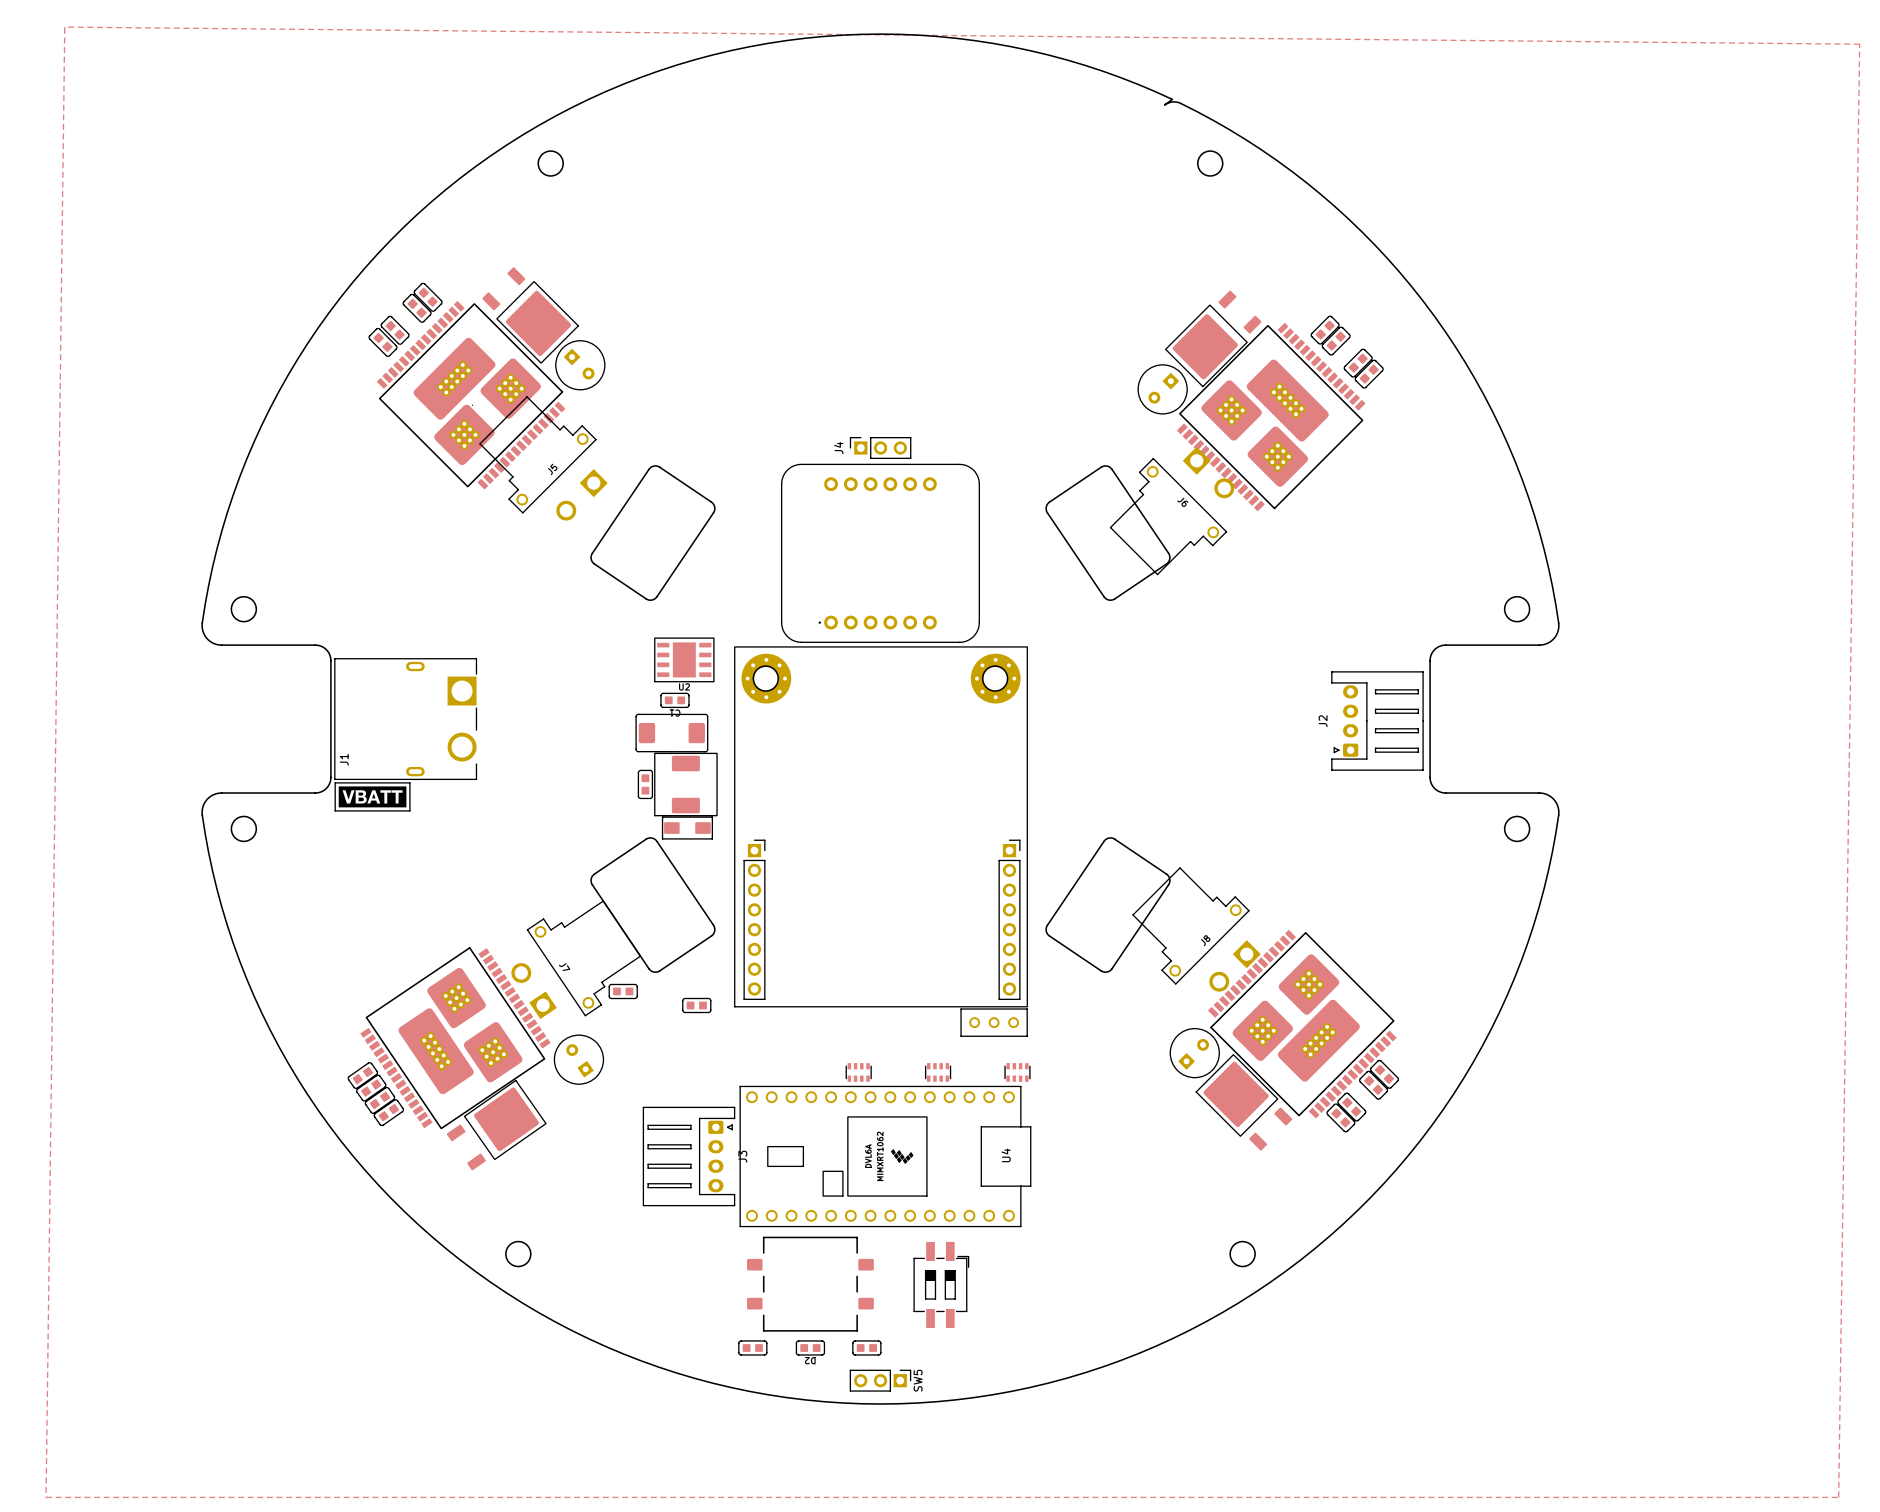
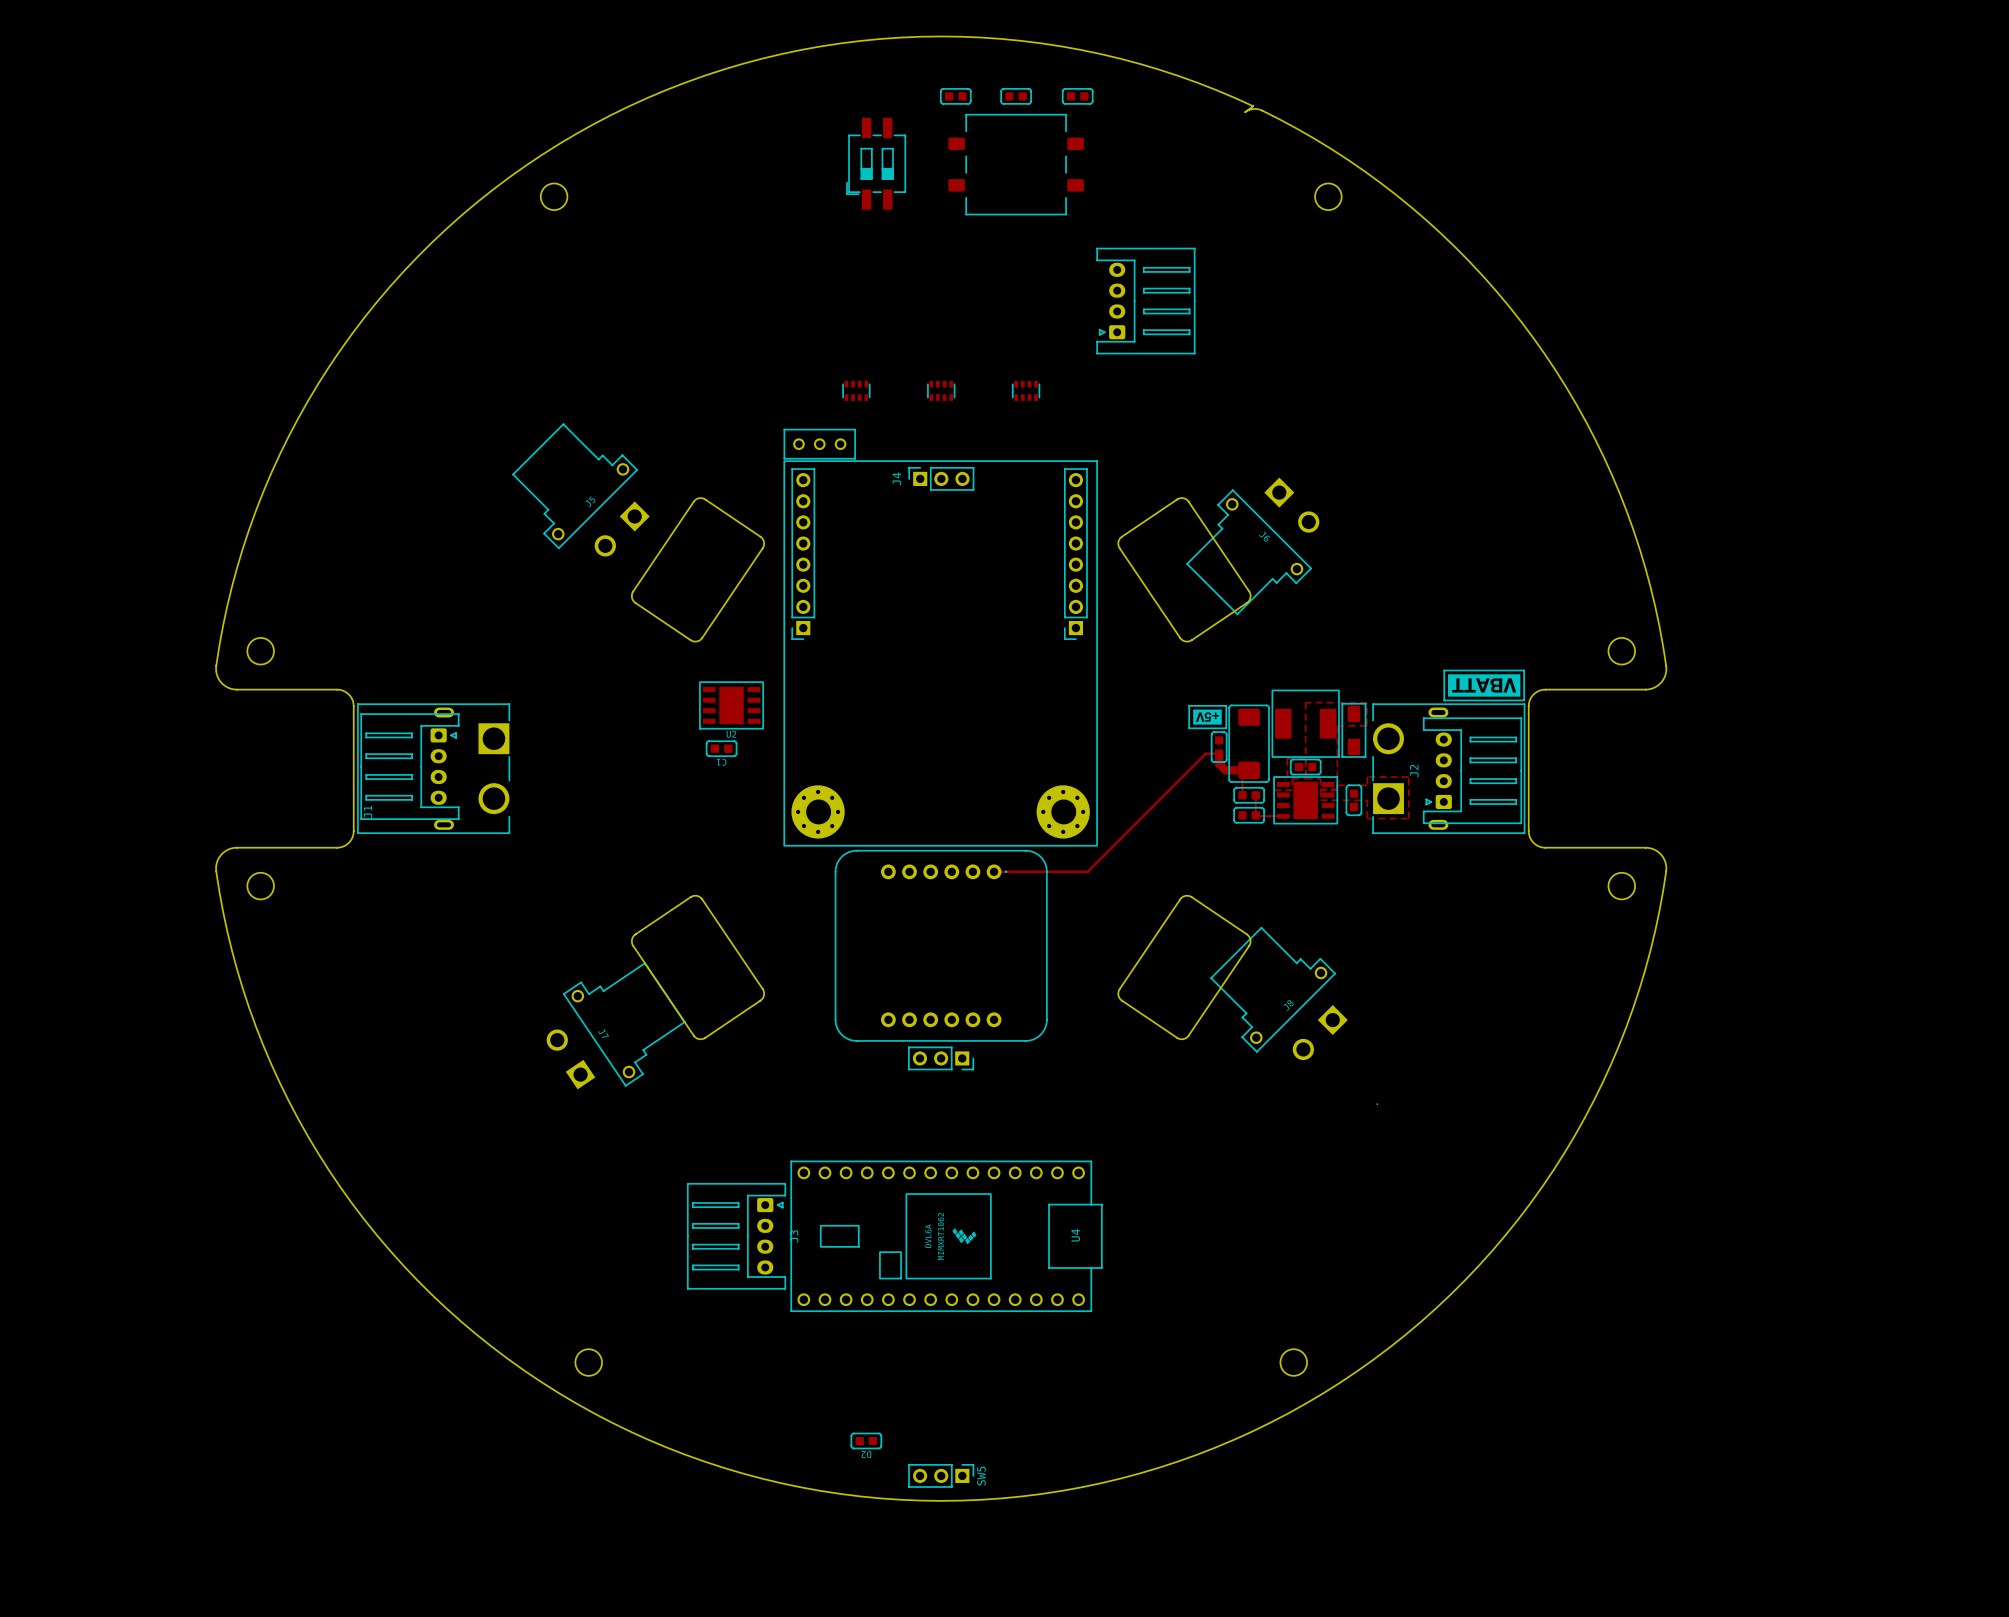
zone outline: (64, 27) (1859, 44) (1838, 1497) (46, 1497) (64, 27) -> none
part: none -> (955, 96)
part: none -> (1016, 96)
part: none -> (1077, 96)
part: none -> (876, 163)
part: none -> (1016, 164)
round board edge position: (550, 163) -> (554, 196)
round board edge position: (1210, 163) -> (1328, 196)
part: none -> (1145, 301)
part: (428, 297) -> none
part: (417, 308) -> none
part: (530, 315) -> none
part: (395, 330) -> none
part: (1325, 330) -> none
part: (1213, 338) -> none
part: (1336, 341) -> none
part: (383, 342) -> none
part: (1358, 363) -> none
part: (580, 365) -> none
part: none -> (856, 390)
part: none -> (941, 390)
part: none -> (1026, 390)
part: (1369, 374) -> none
part: (1162, 389) -> none
part: (471, 395) -> none
part: none -> (819, 444)
part: (1271, 417) -> none
part: (880, 553) -> none
part: none -> (940, 653)
line: none -> (1444, 670) (1444, 700) (1524, 700) (1524, 670) (1444, 670)
drawing: none -> [1448, 674, 1521, 697]
line: none -> (1189, 705) (1189, 728) (1226, 728) (1226, 705) (1189, 705)
drawing: none -> [1193, 709, 1222, 725]
part: none -> (1305, 723)
round board edge position: (765, 678) -> (818, 811)
round board edge position: (995, 678) -> (1063, 811)
part: none -> (1353, 730)
part: none -> (1249, 743)
part: none -> (1219, 747)
zone outline: none -> (1305, 758) (1287, 758) (1287, 776) (1274, 776) (1274, 790) (1292, 790) (1292, 778) (1305, 778)
part: none -> (409, 766)
part: none -> (1305, 767)
part: none -> (1448, 768)
zone outline: none -> (1367, 776) (1367, 785) (1337, 785) (1337, 790) (1320, 790) (1320, 800) (1367, 800) (1367, 818) (1408, 818) (1408, 776) (1367, 776)
zone outline: none -> (1305, 778) (1305, 702) (1366, 702) (1366, 725) (1337, 725) (1337, 789) (1320, 789) (1320, 778) (1305, 778)
part: (671, 733) -> none
track: none -> (1242, 795) (1242, 776) (1249, 770) (1225, 770) (1219, 763) (1219, 753) (1205, 753) (1087, 871) (994, 871)
part: none -> (1249, 795)
track: none -> (1255, 795) (1256, 816) (1283, 816)
part: none -> (1305, 800)
part: none -> (1353, 800)
part: none -> (1249, 815)
line: (335, 782) (409, 782) (409, 810) (335, 810) (335, 782) -> none
part: (645, 784) -> none
part: (685, 784) -> none
drawing: [338, 786, 407, 808] -> none
part: (881, 826) -> none
part: (687, 828) -> none
part: none -> (941, 945)
part: none -> (941, 1058)
part: (623, 991) -> none
part: (696, 1005) -> none
part: (994, 1022) -> none
part: (1302, 1024) -> none
part: (455, 1038) -> none
part: (1194, 1053) -> none
part: (578, 1059) -> none
part: (858, 1072) -> none
part: (938, 1072) -> none
part: (1017, 1072) -> none
part: (1384, 1074) -> none
part: (362, 1075) -> none
part: (1373, 1085) -> none
part: (371, 1088) -> none
part: (379, 1100) -> none
part: (1244, 1102) -> none
part: (1351, 1107) -> none
part: (388, 1112) -> none
part: (1340, 1117) -> none
part: (496, 1125) -> none
round board edge position: (518, 1254) -> (588, 1362)
round board edge position: (1242, 1254) -> (1293, 1362)
part: (810, 1284) -> none
part: (941, 1284) -> none
part: (752, 1347) -> none
part: (866, 1347) -> none

